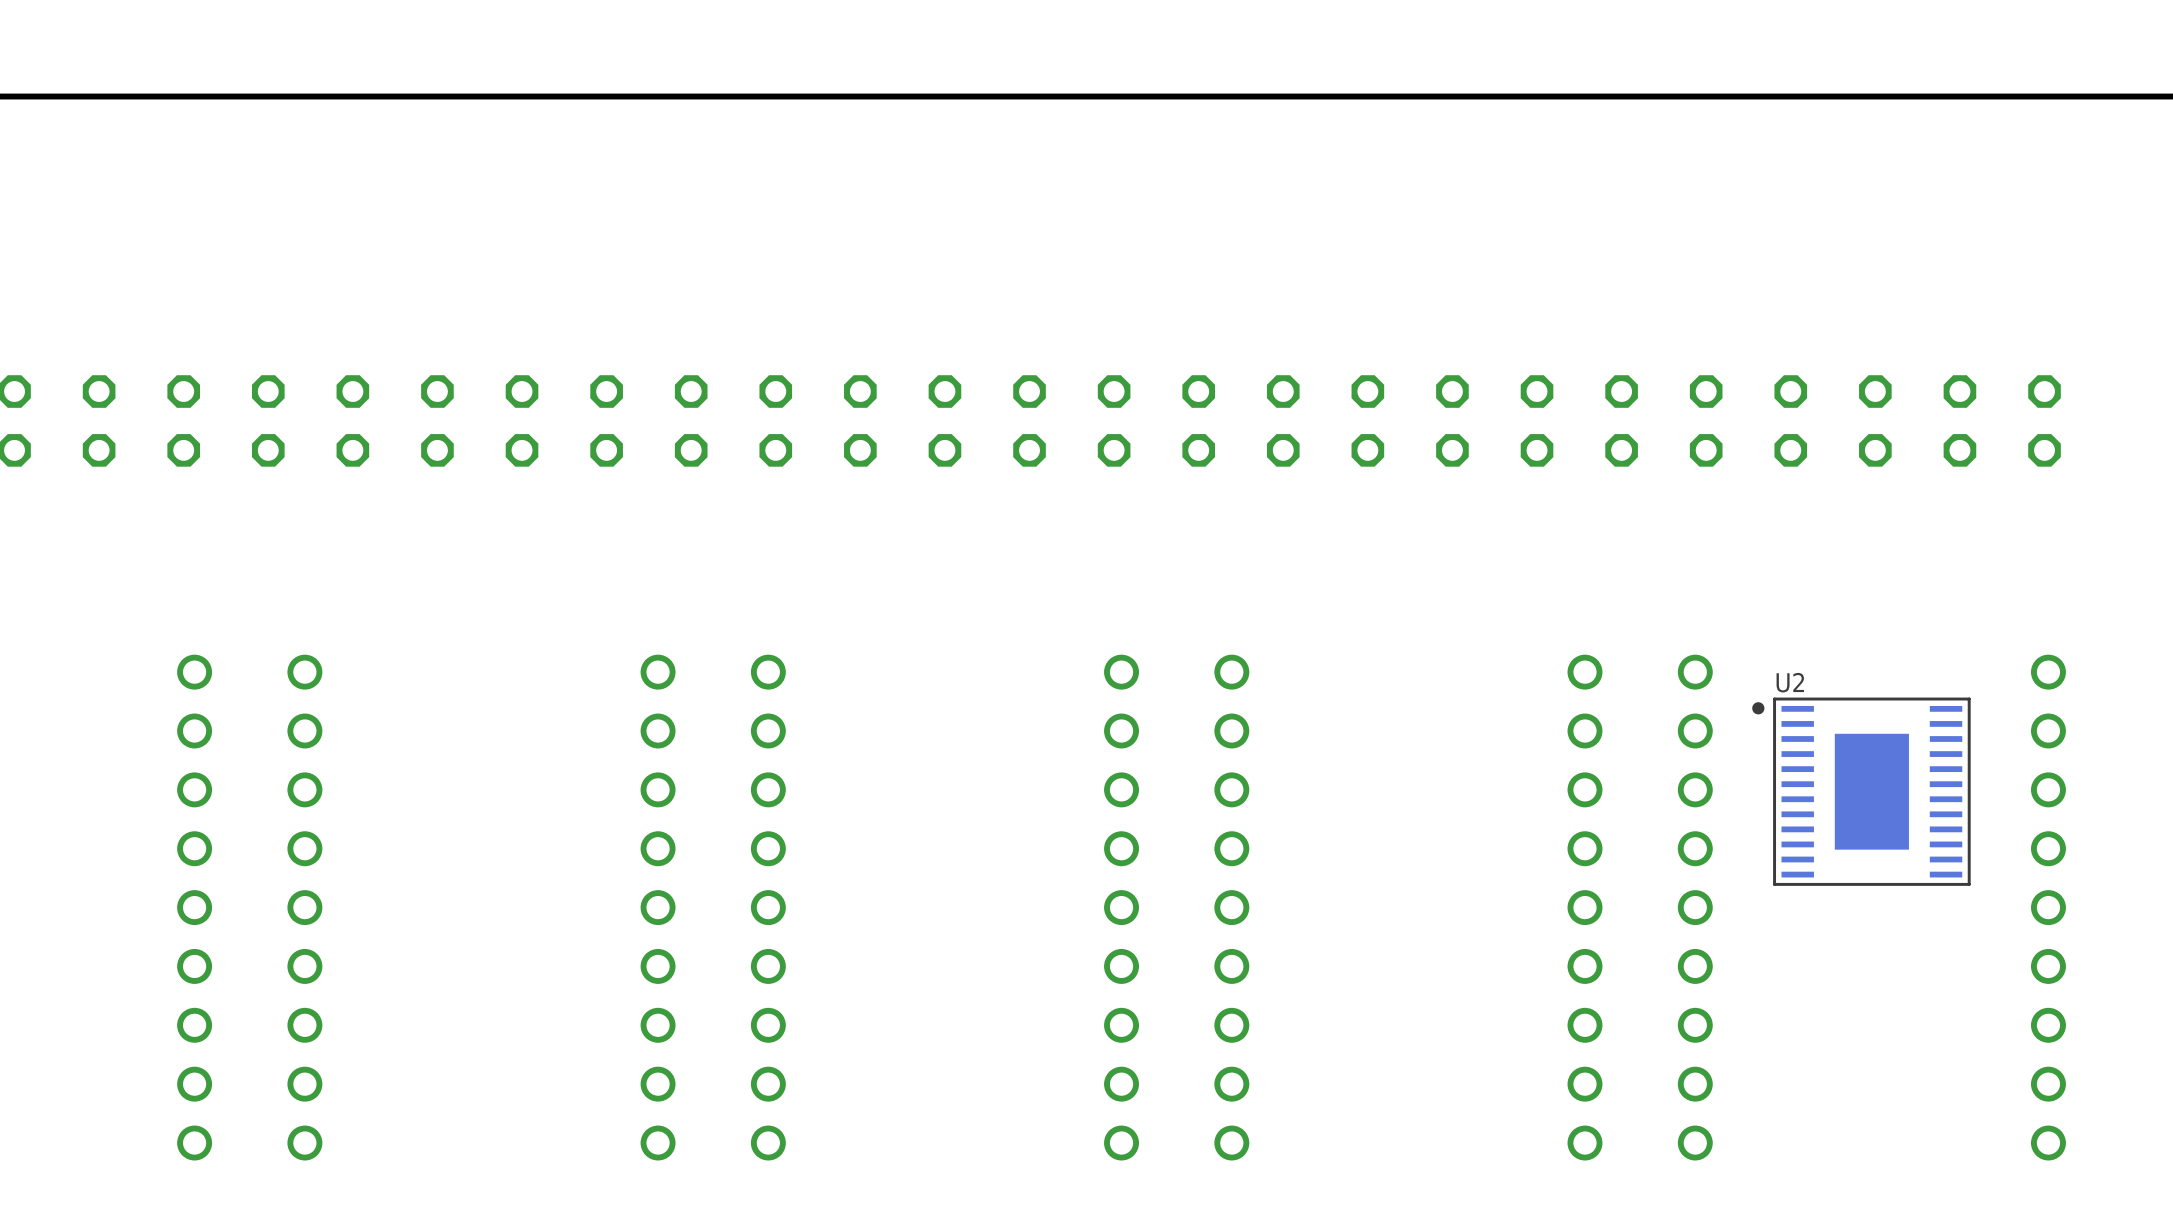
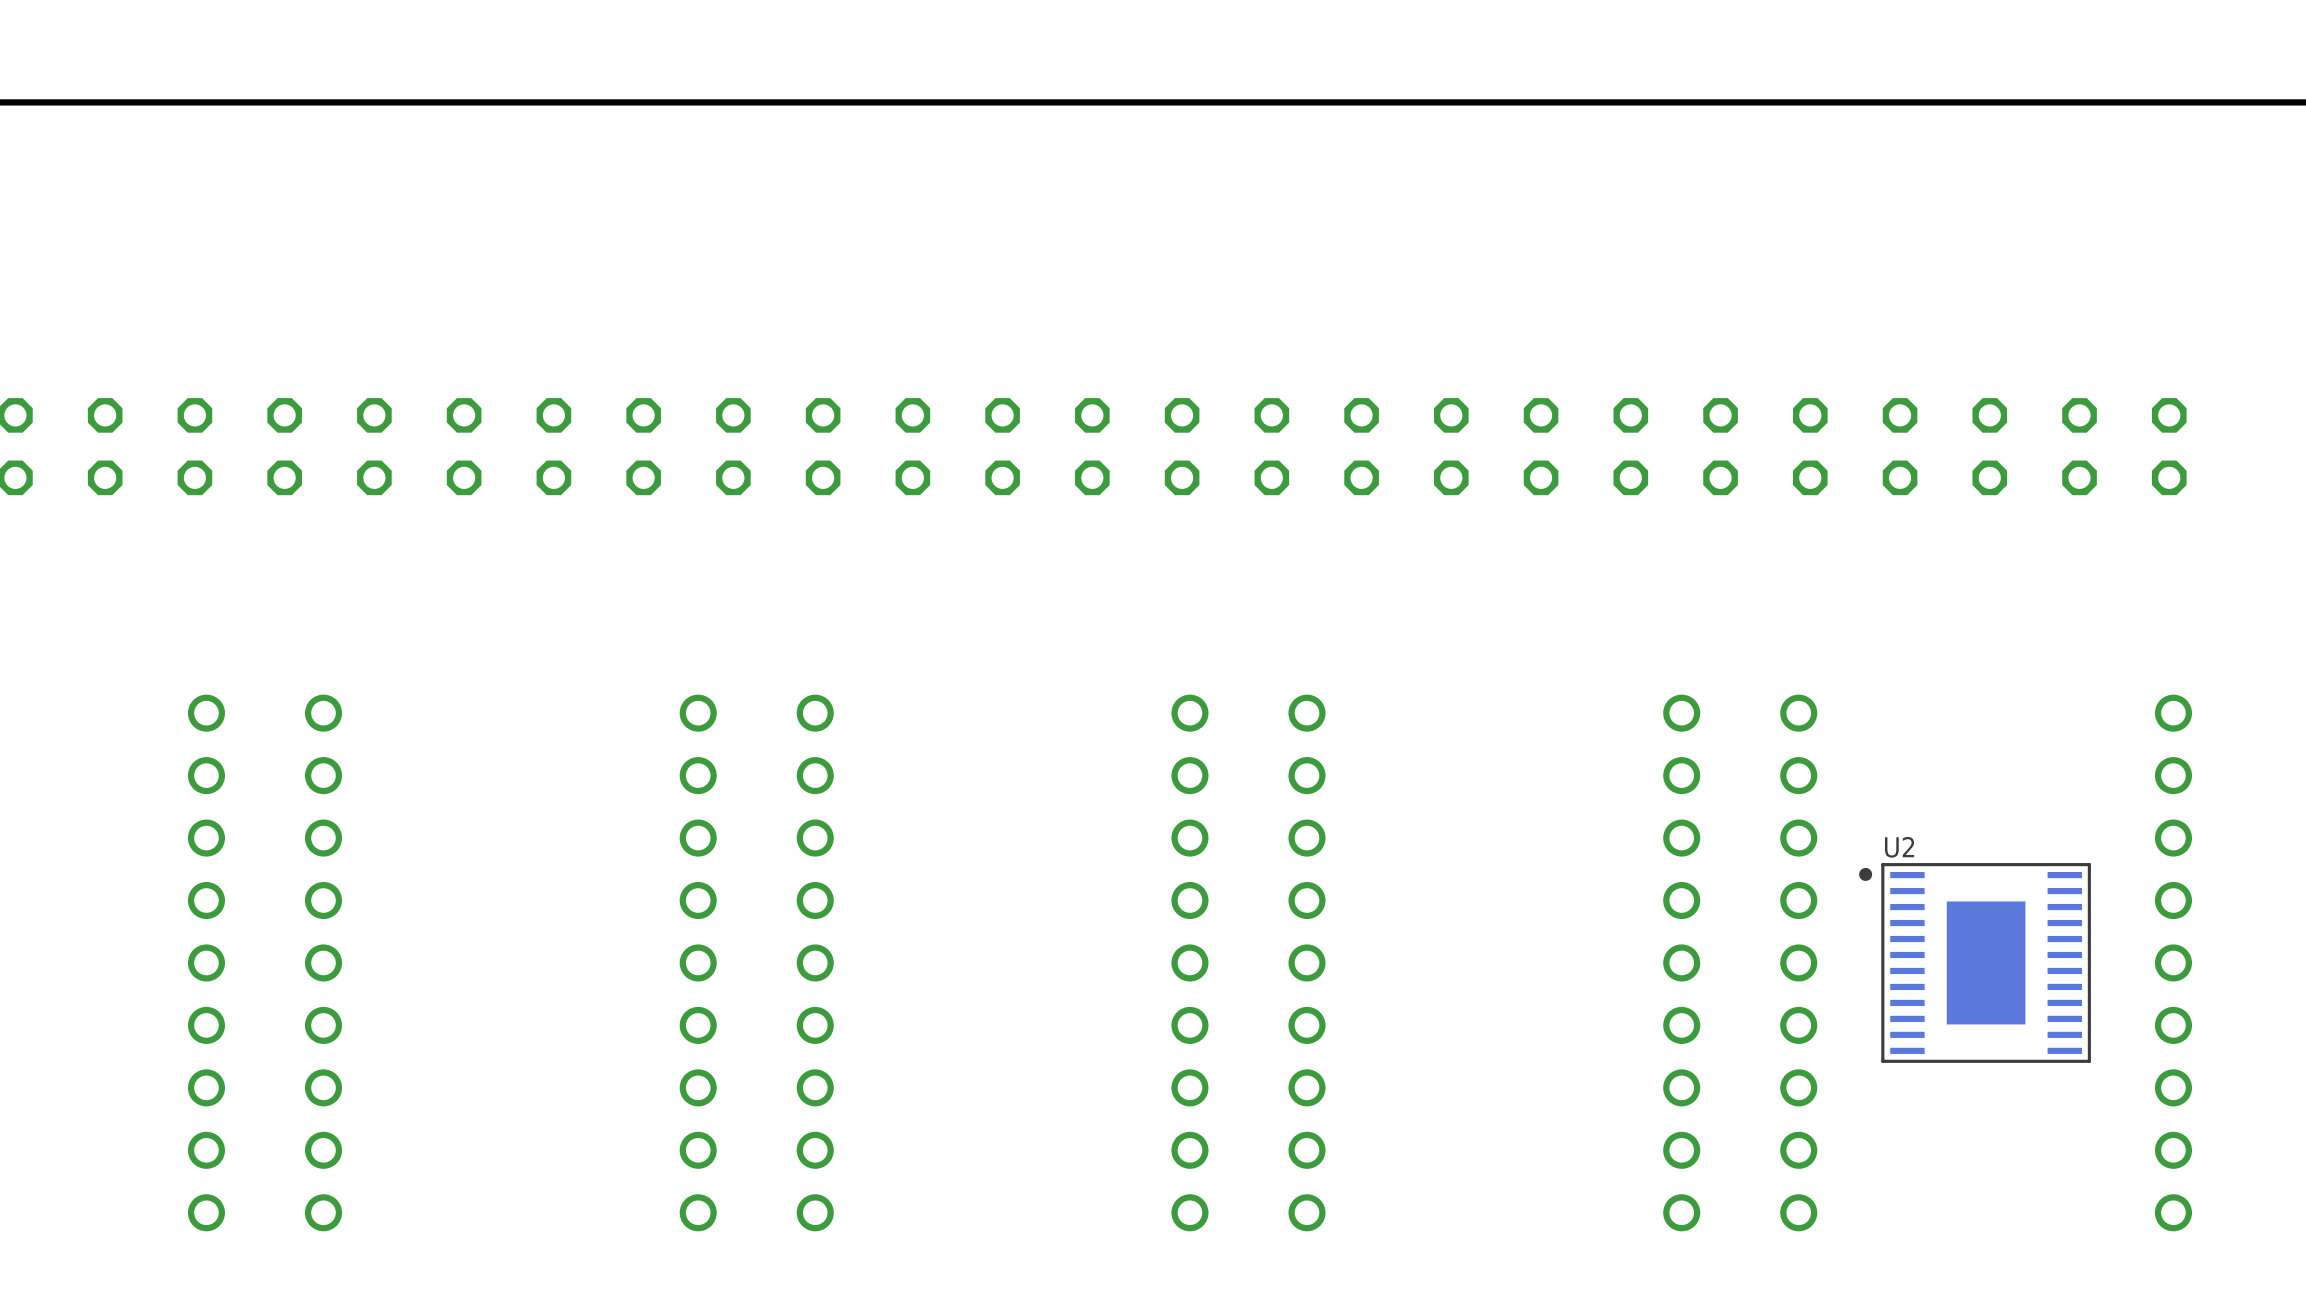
U2 position: (1861, 791) -> (1975, 962)

